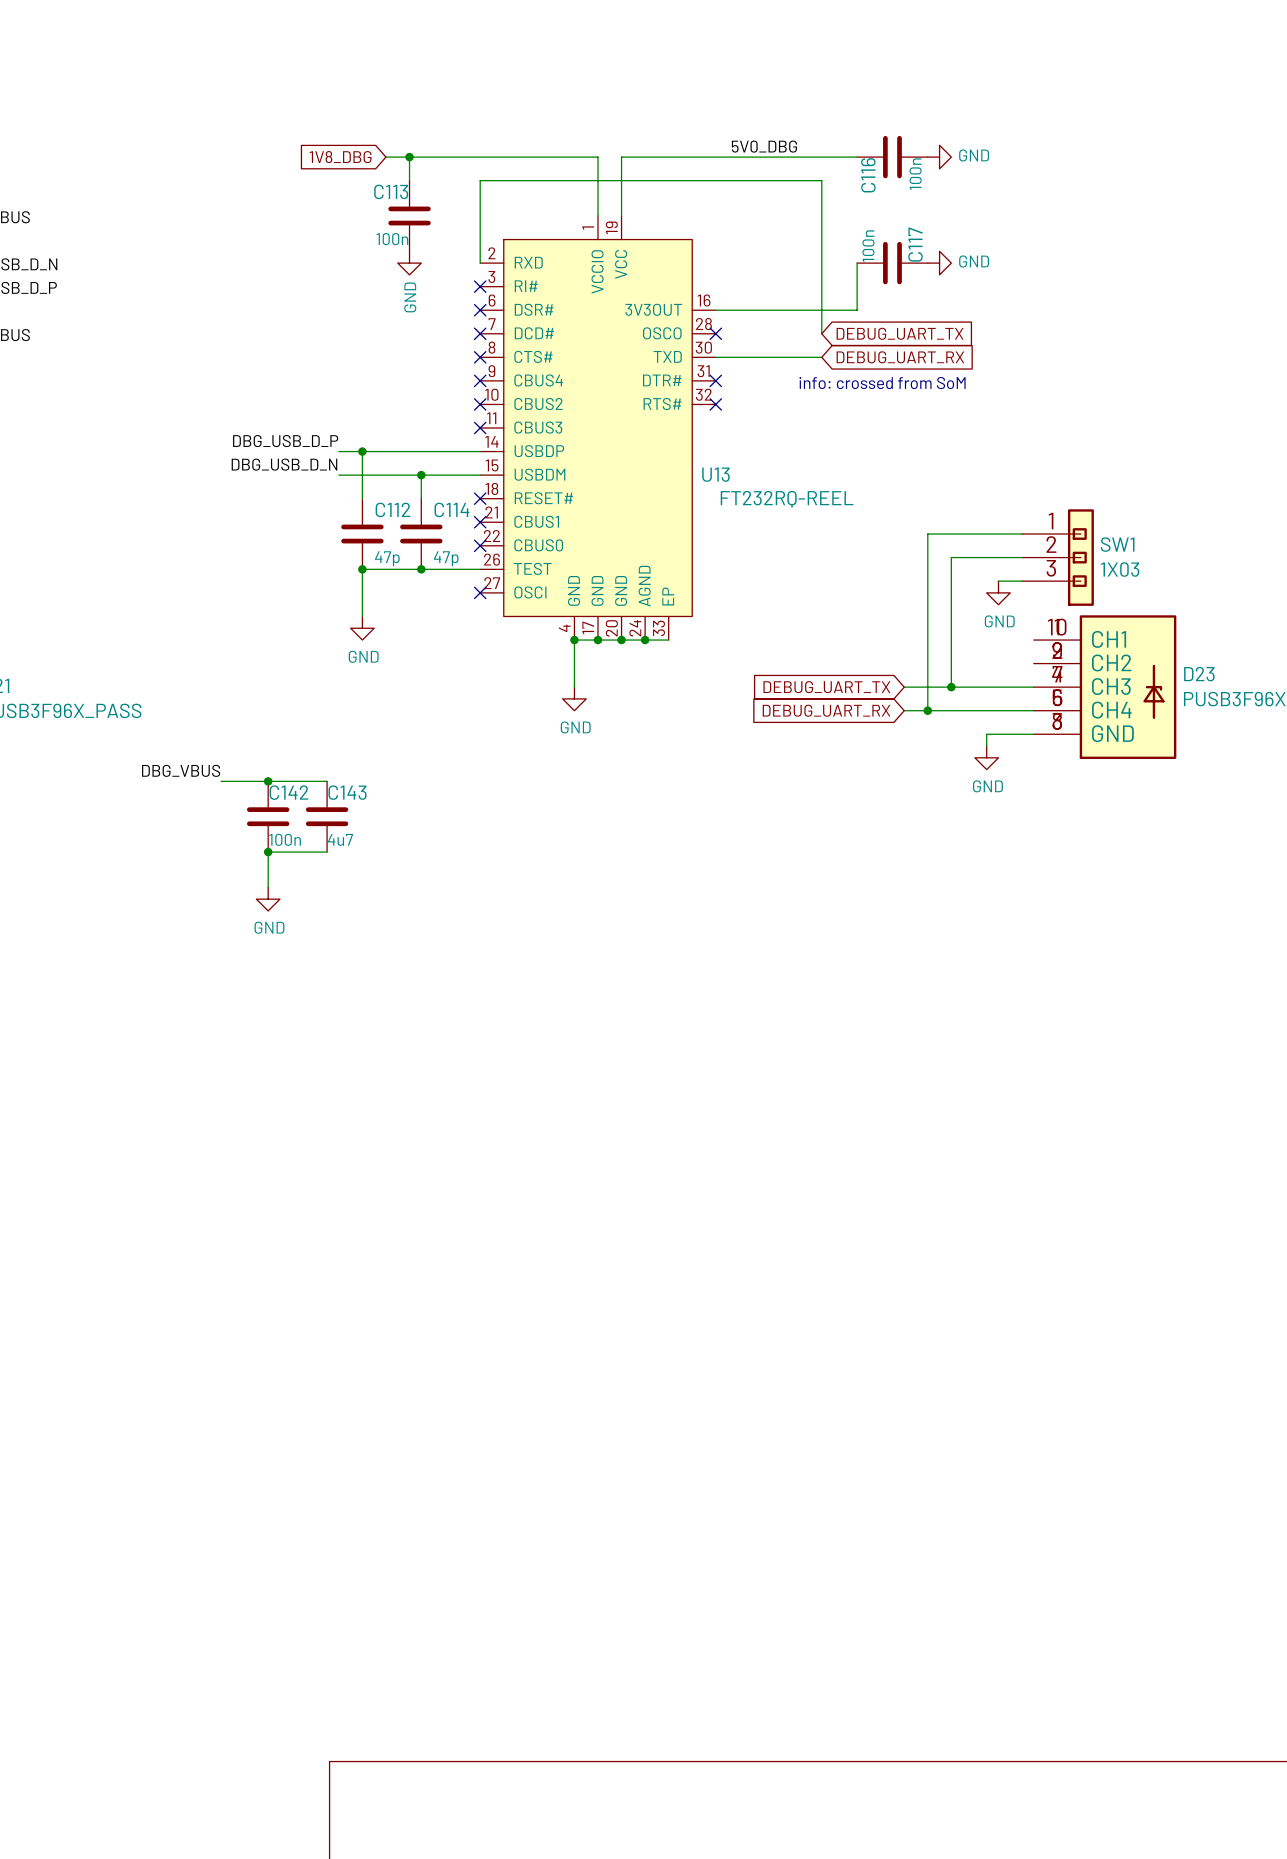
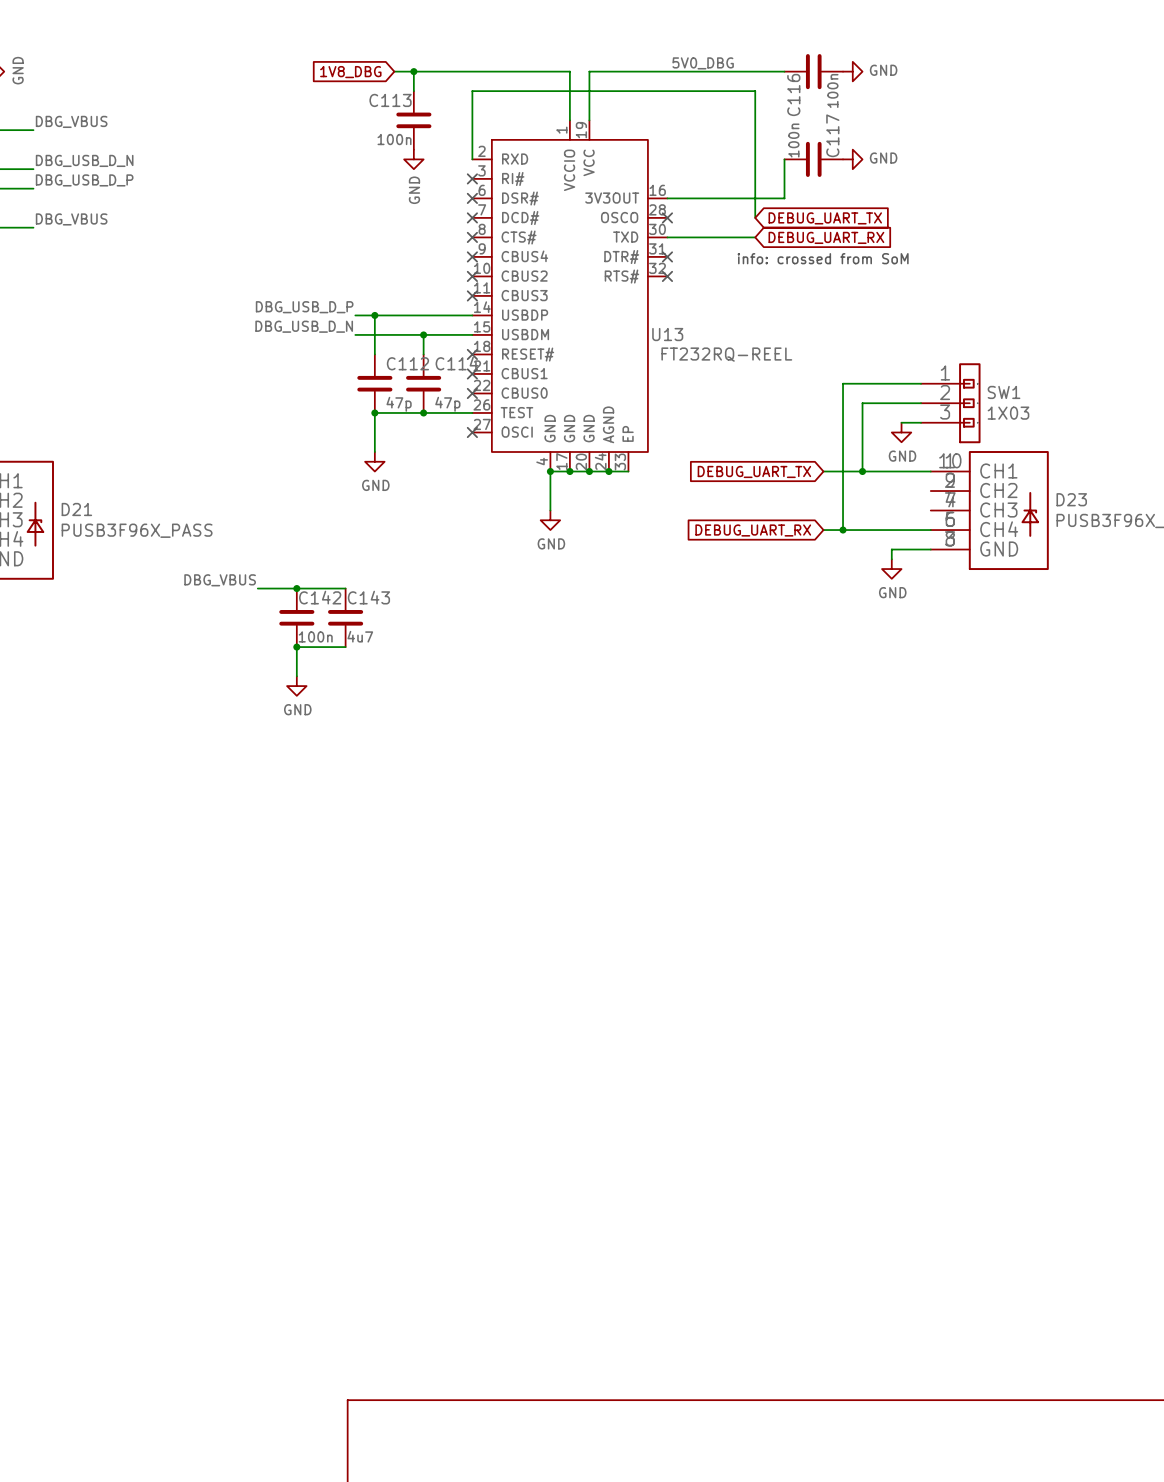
wire: (951, 640) (951, 687) -> none
global label position: DEBUG_UART_TX (826, 687) -> DEBUG_UART_TX (754, 471)
wire: (904, 687) (1033, 687) -> (823, 471) (930, 471)
junction position: (951, 687) -> (862, 471)

